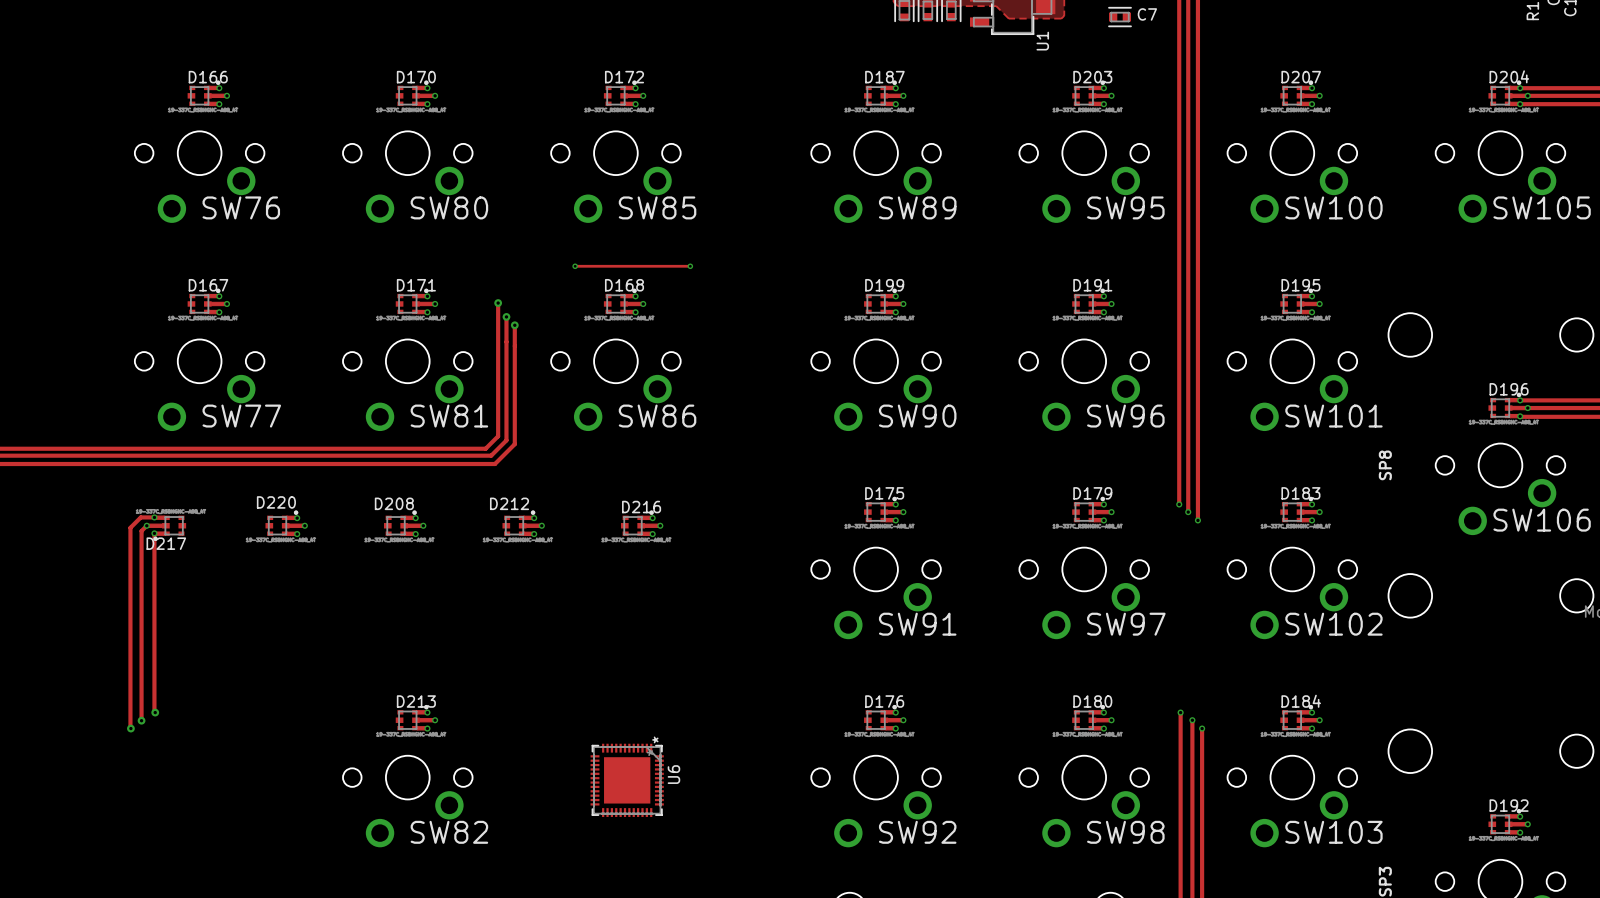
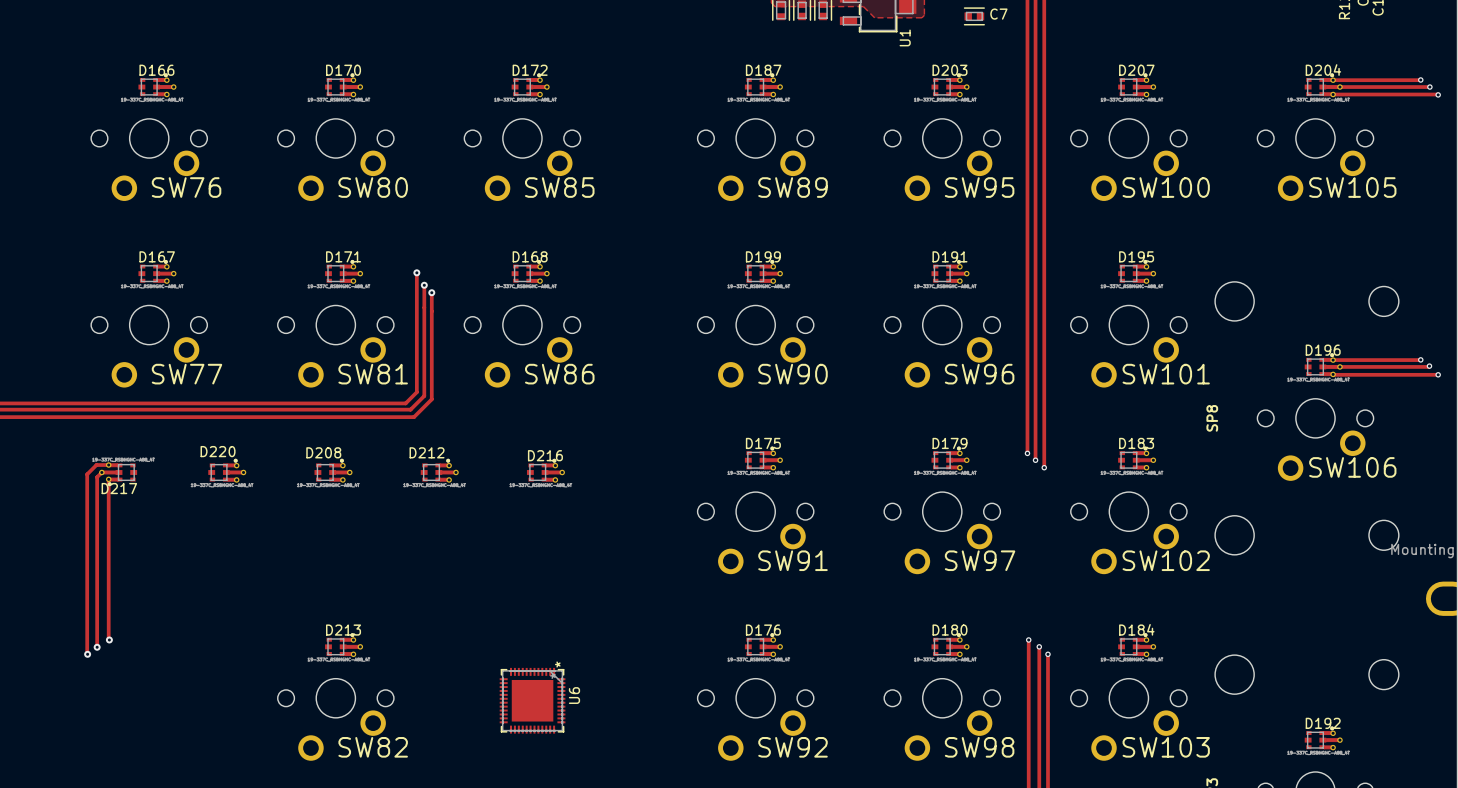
track: (575, 266) (690, 266) -> none
via: (575, 266) -> none
via: (690, 266) -> none

